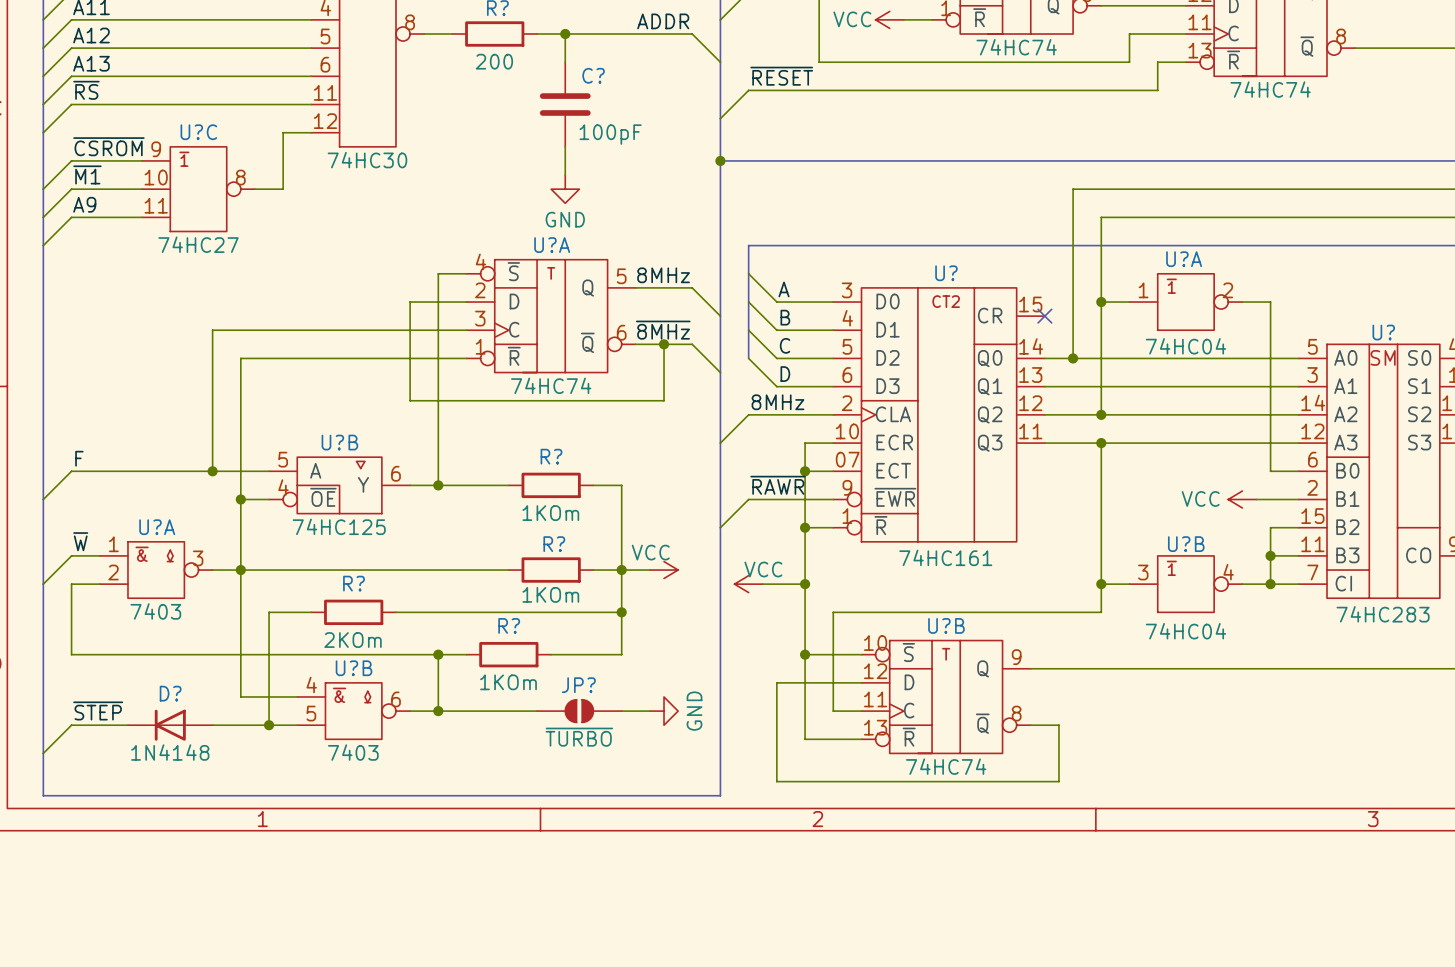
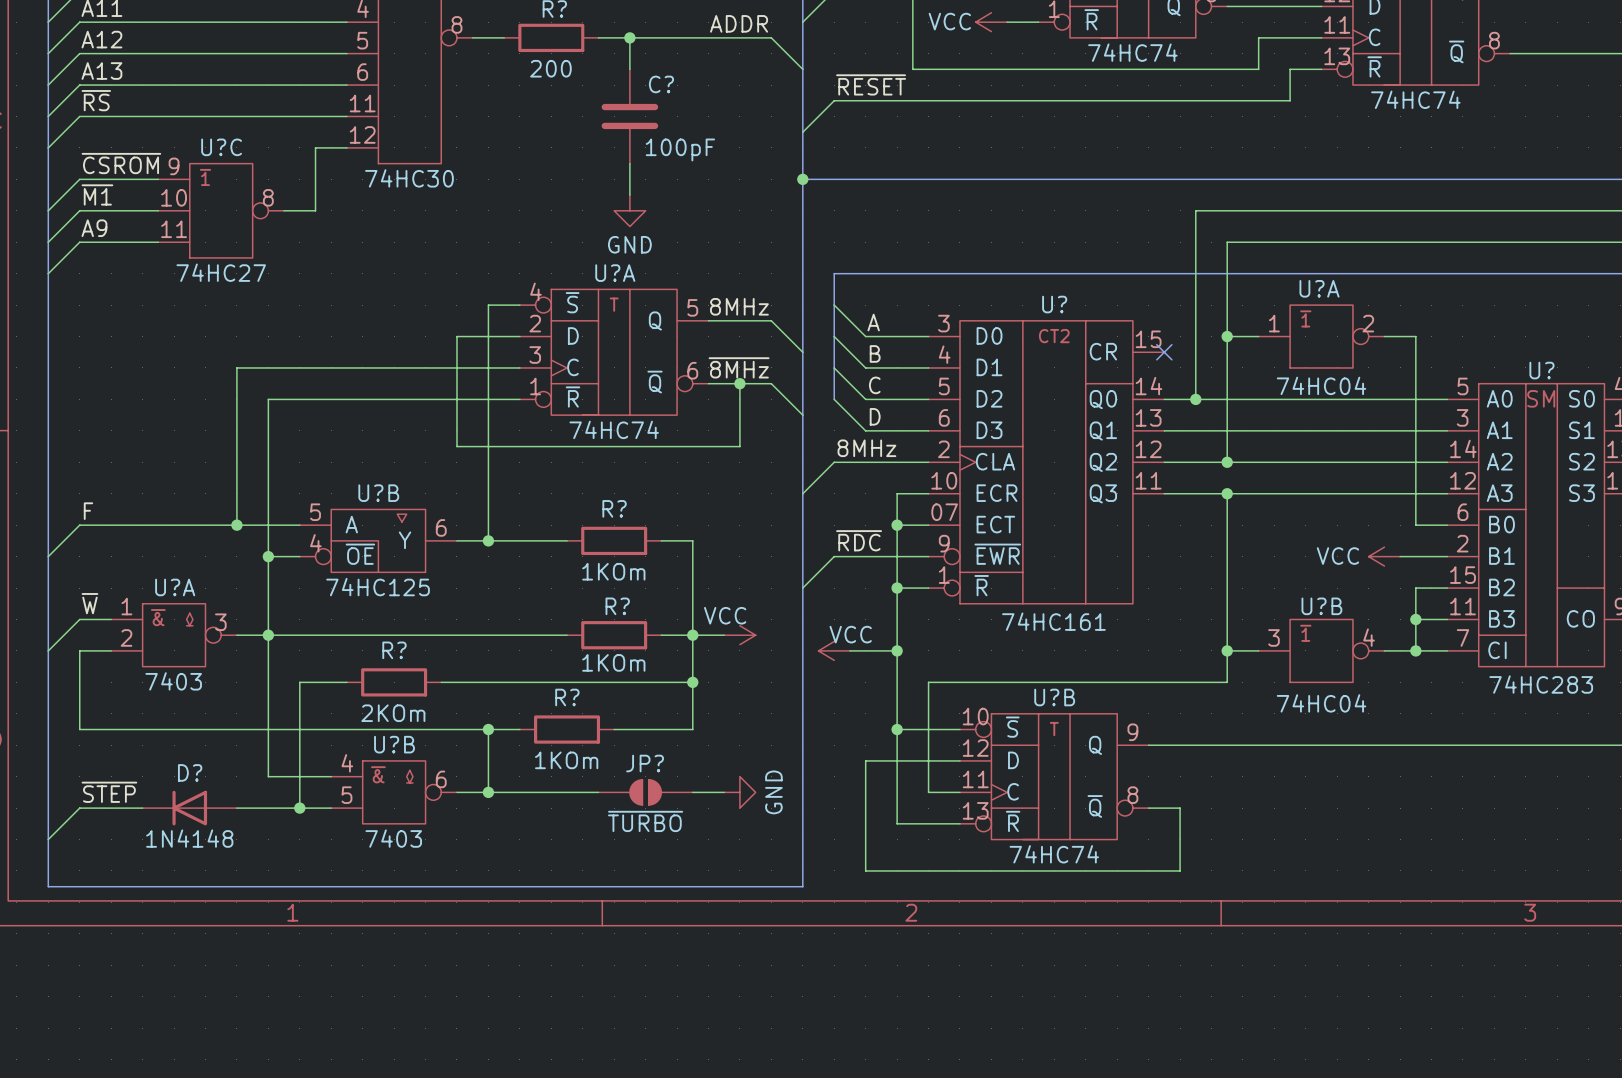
label: ~{RAWR} (777, 485) -> ~{RDC} (859, 540)

